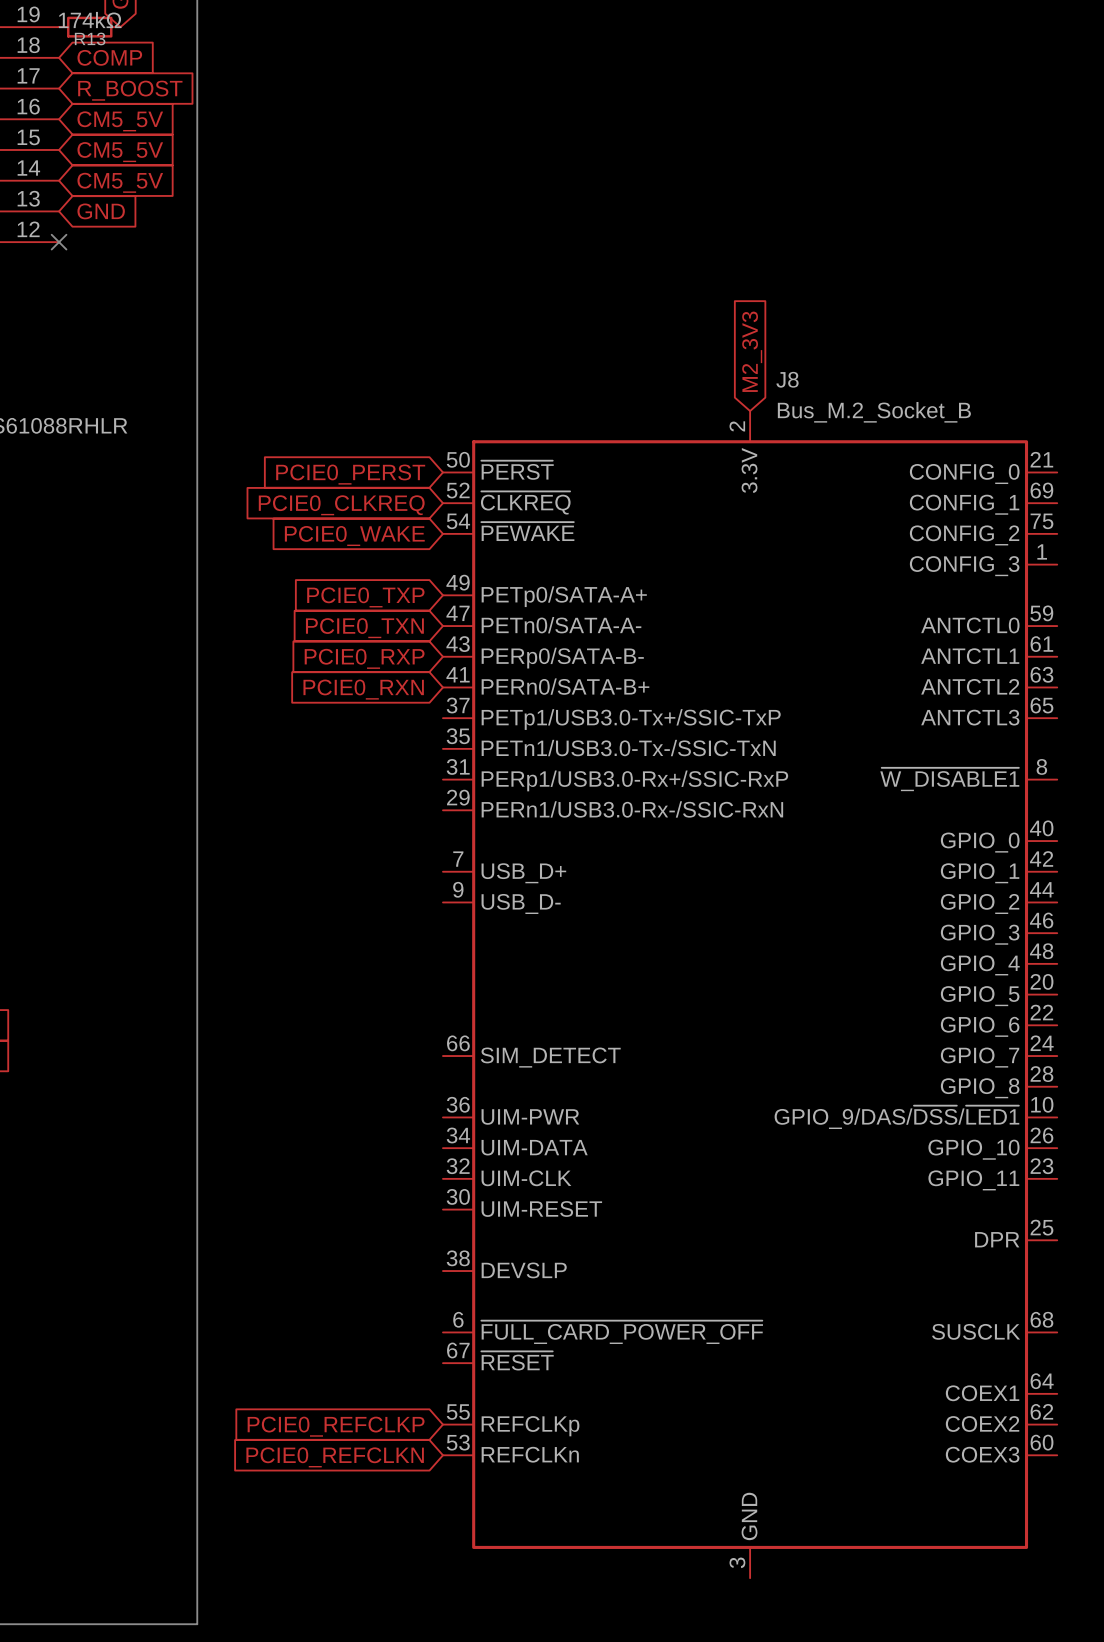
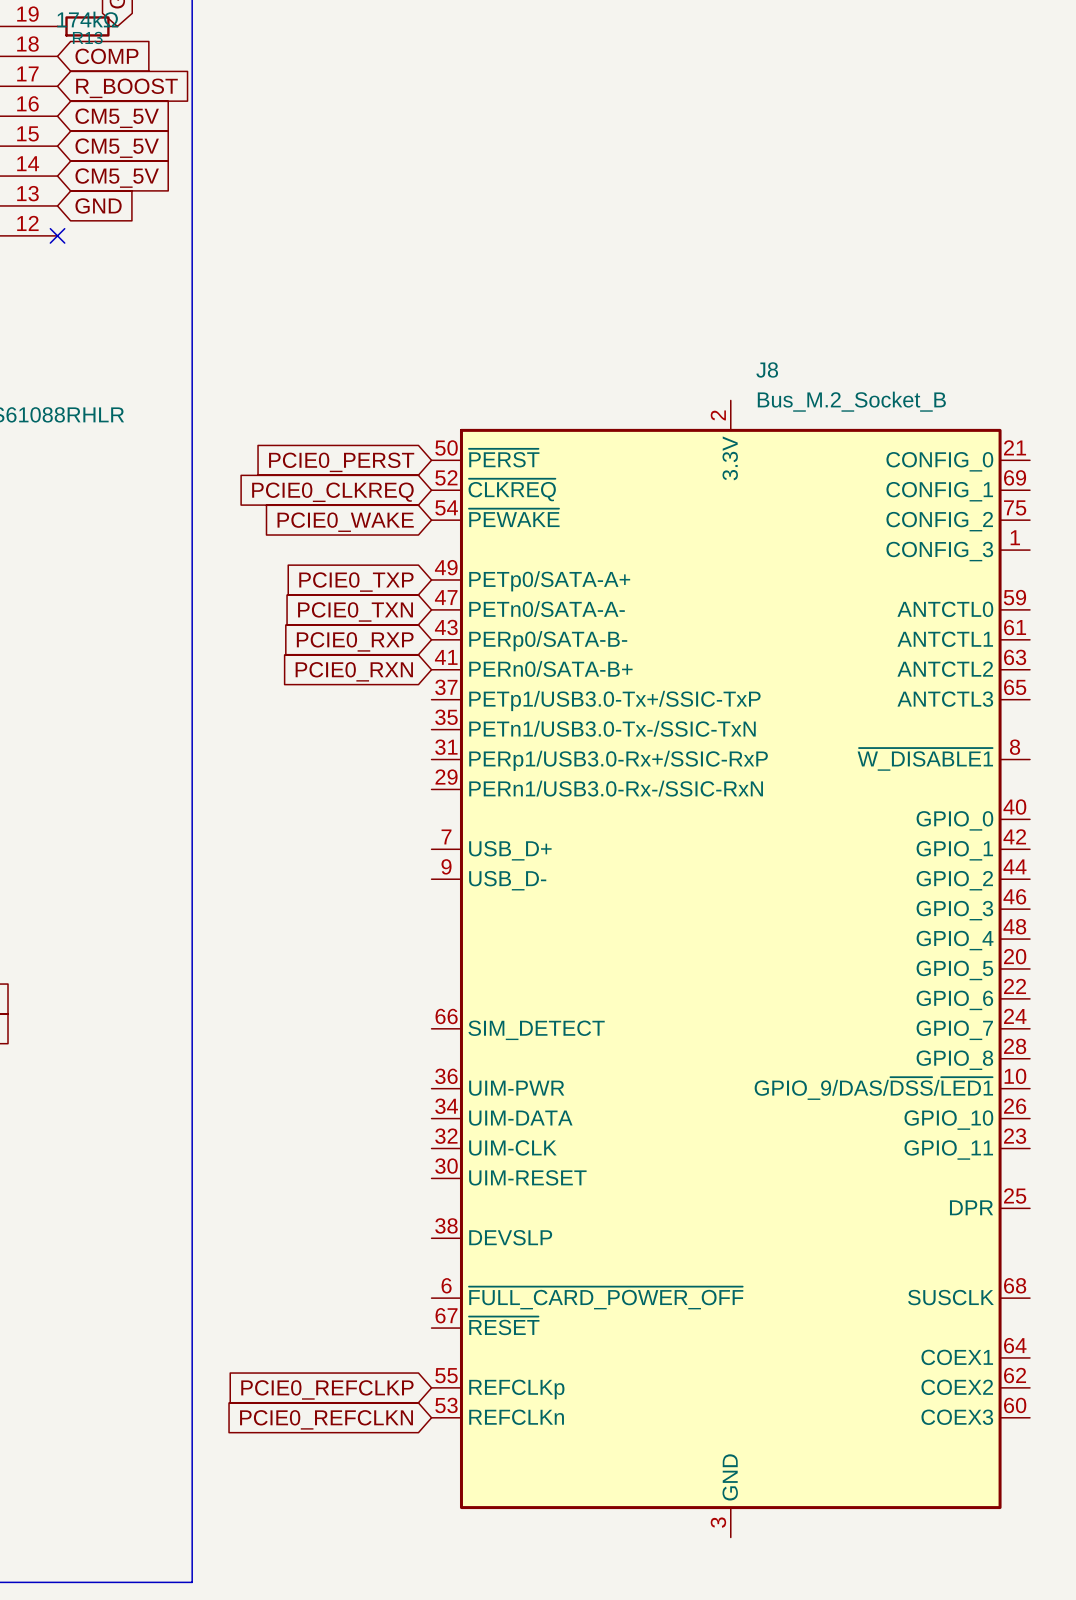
global label: M2_3V3 (752, 351) -> none

